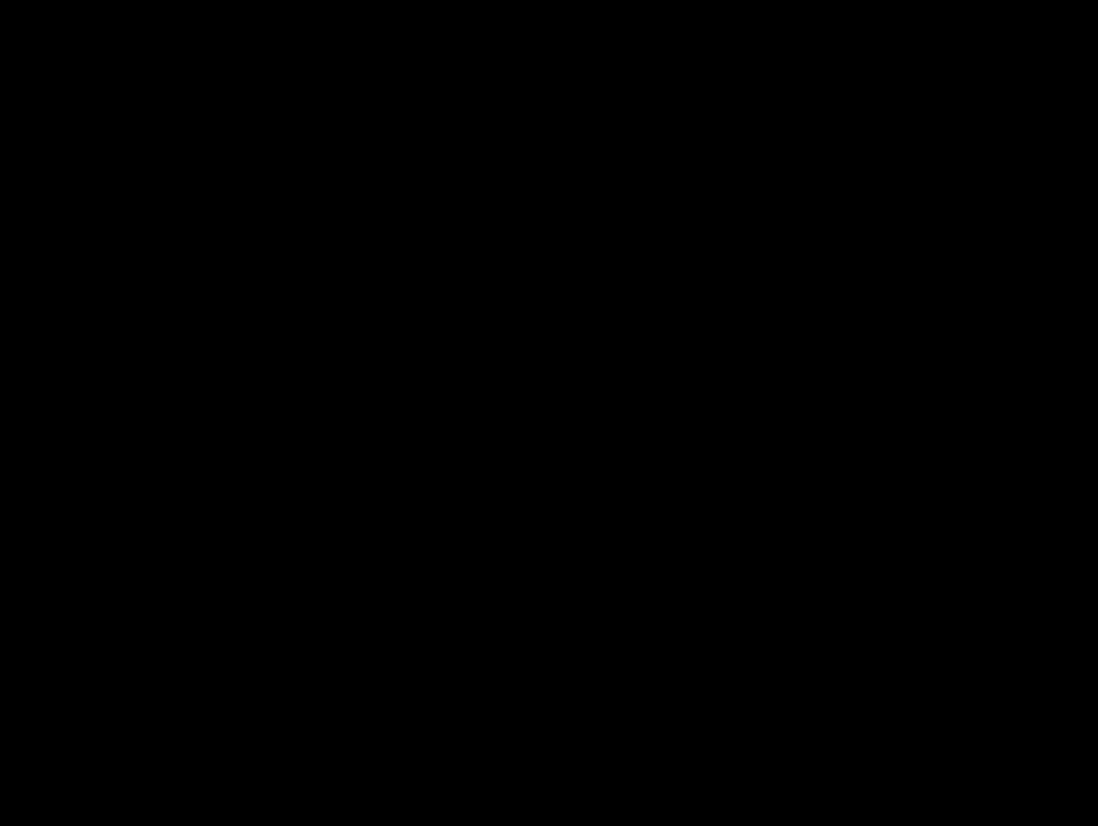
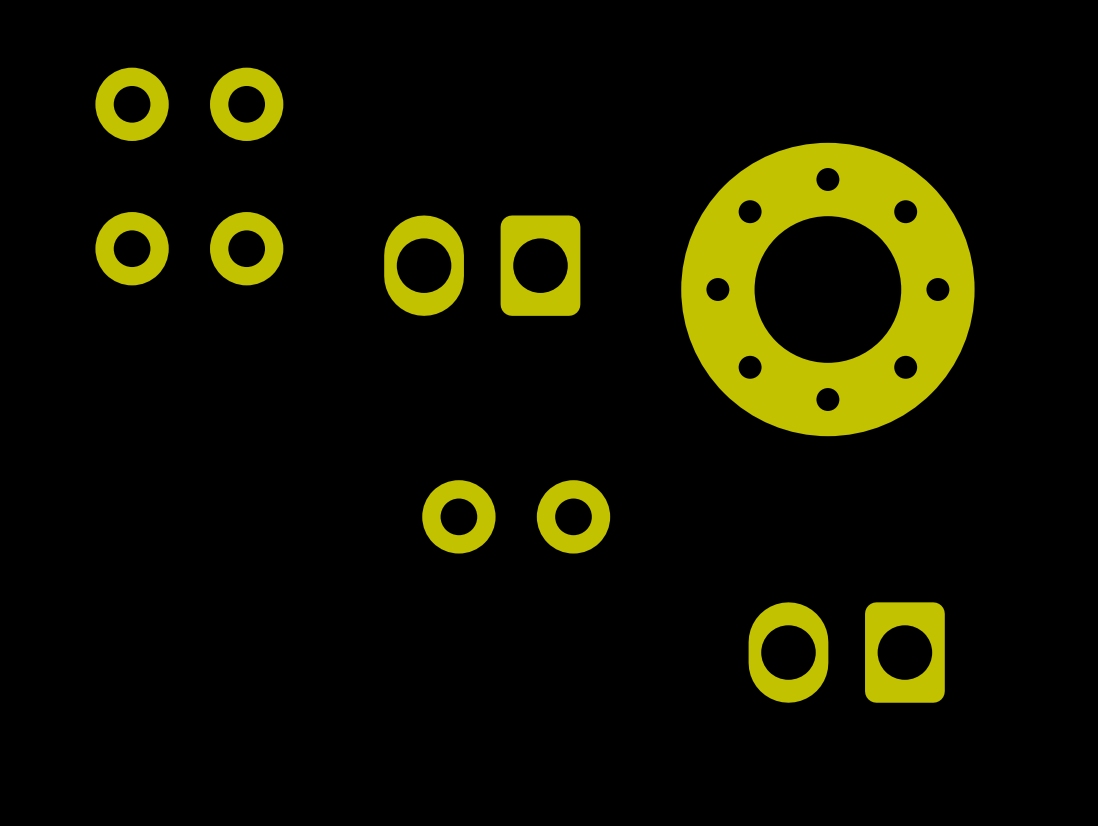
part: none -> (189, 104)
part: none -> (189, 248)
part: none -> (482, 265)
part: none -> (827, 289)
part: none -> (516, 516)
part: none -> (846, 652)

